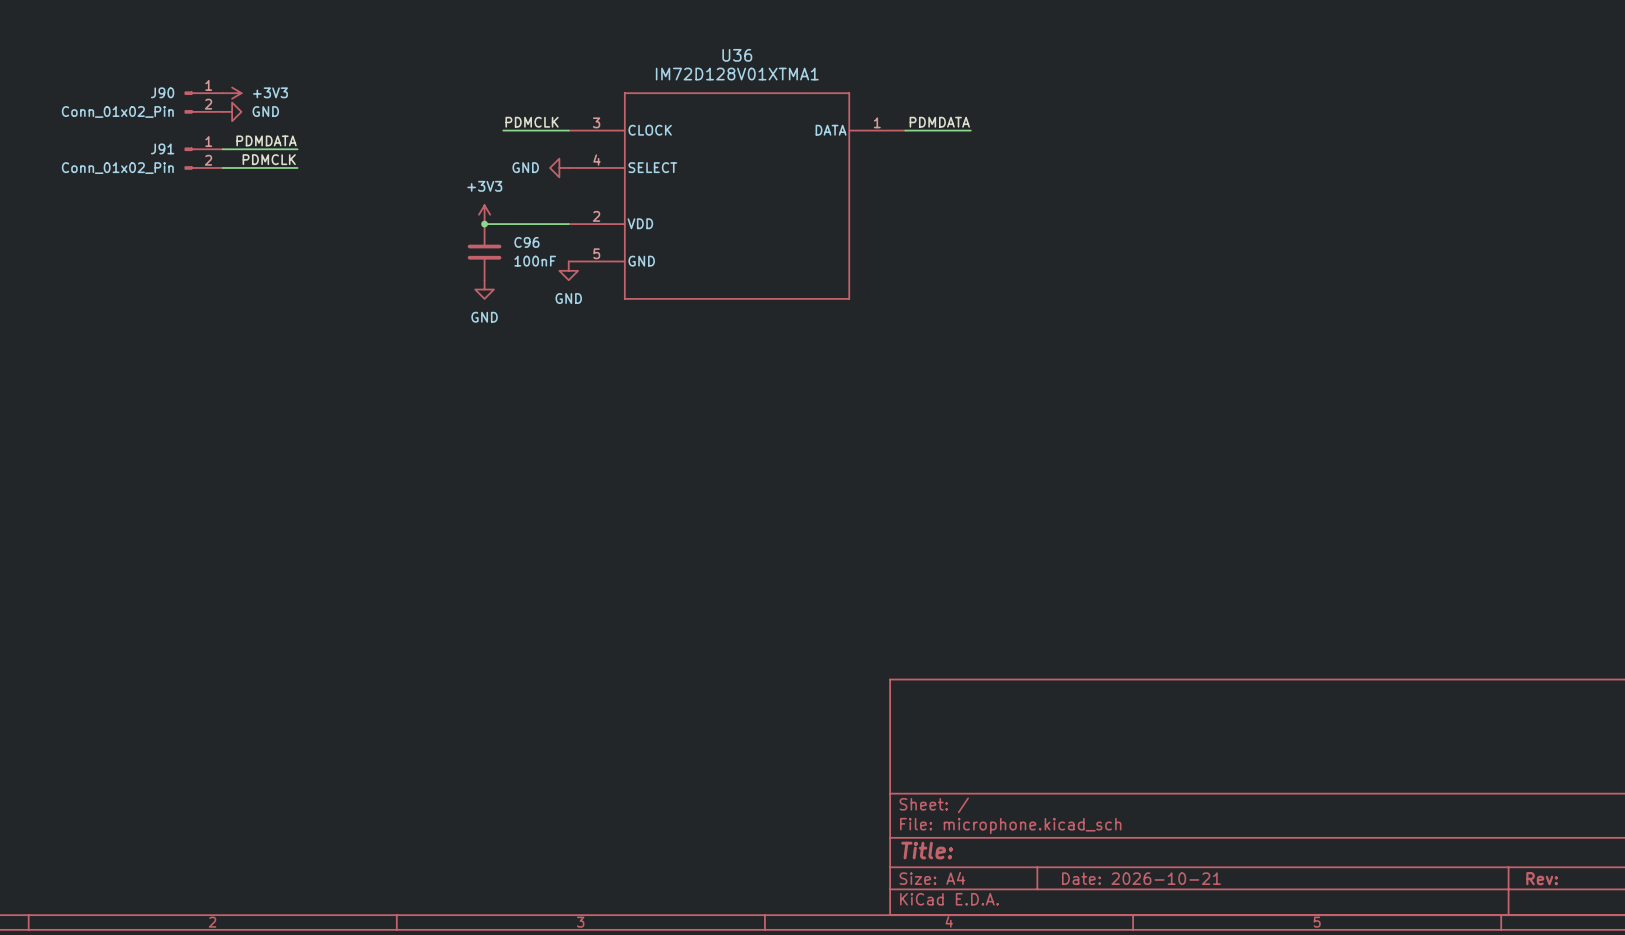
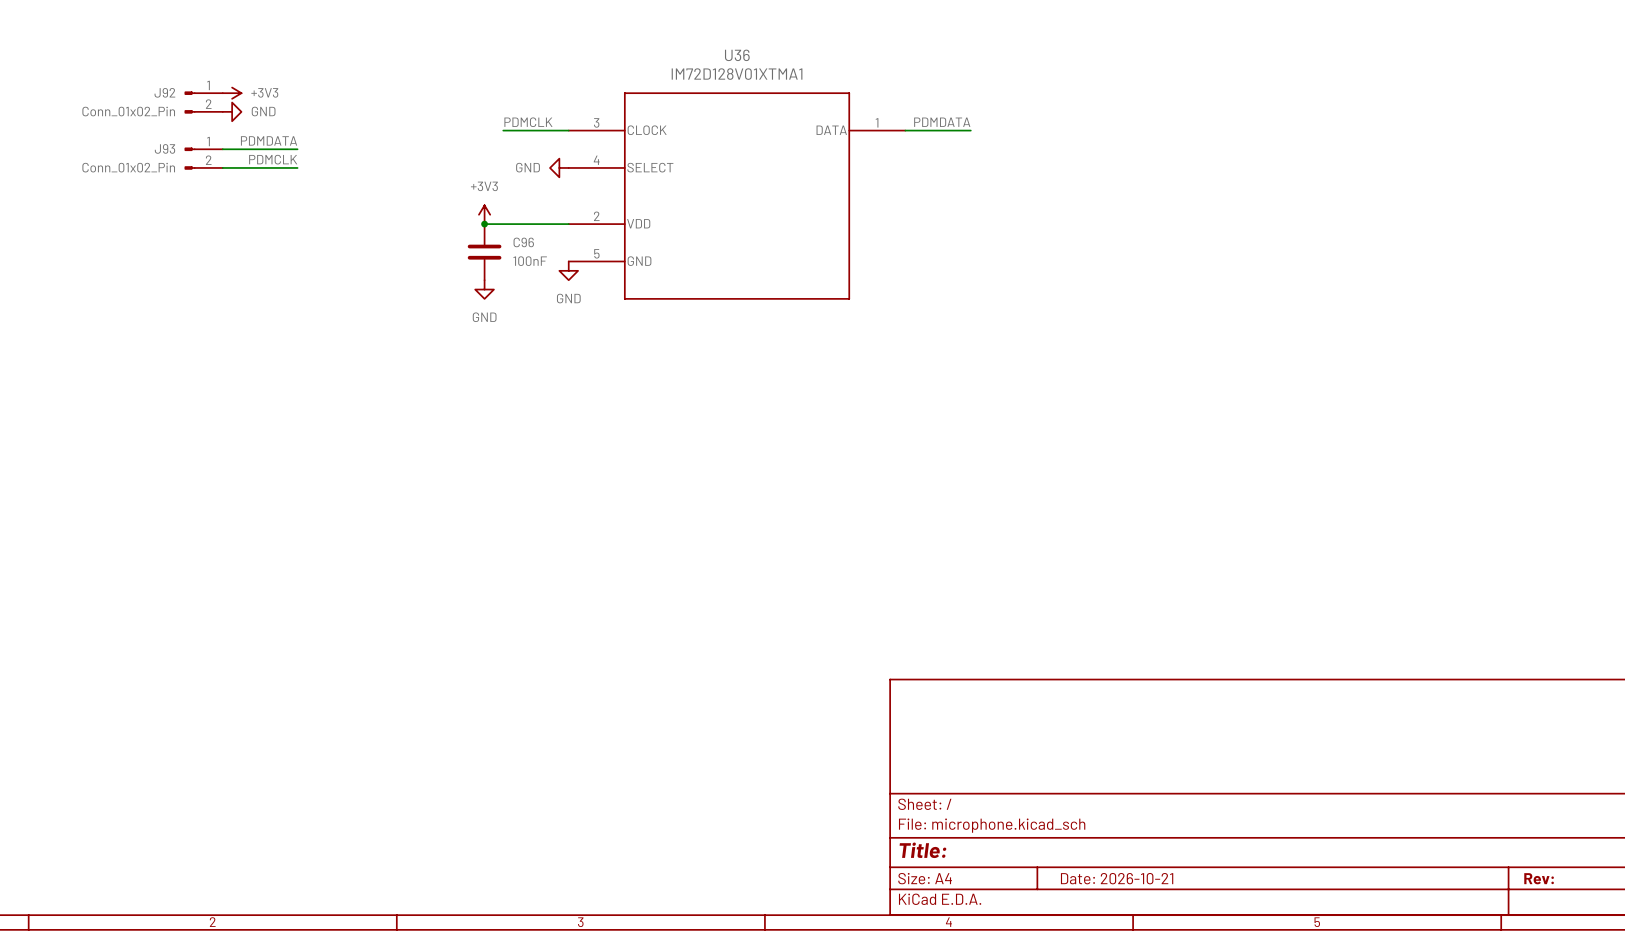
J90 name: J90 (162, 92) -> J92 (164, 92)
J91 name: J91 (162, 148) -> J93 (164, 148)

